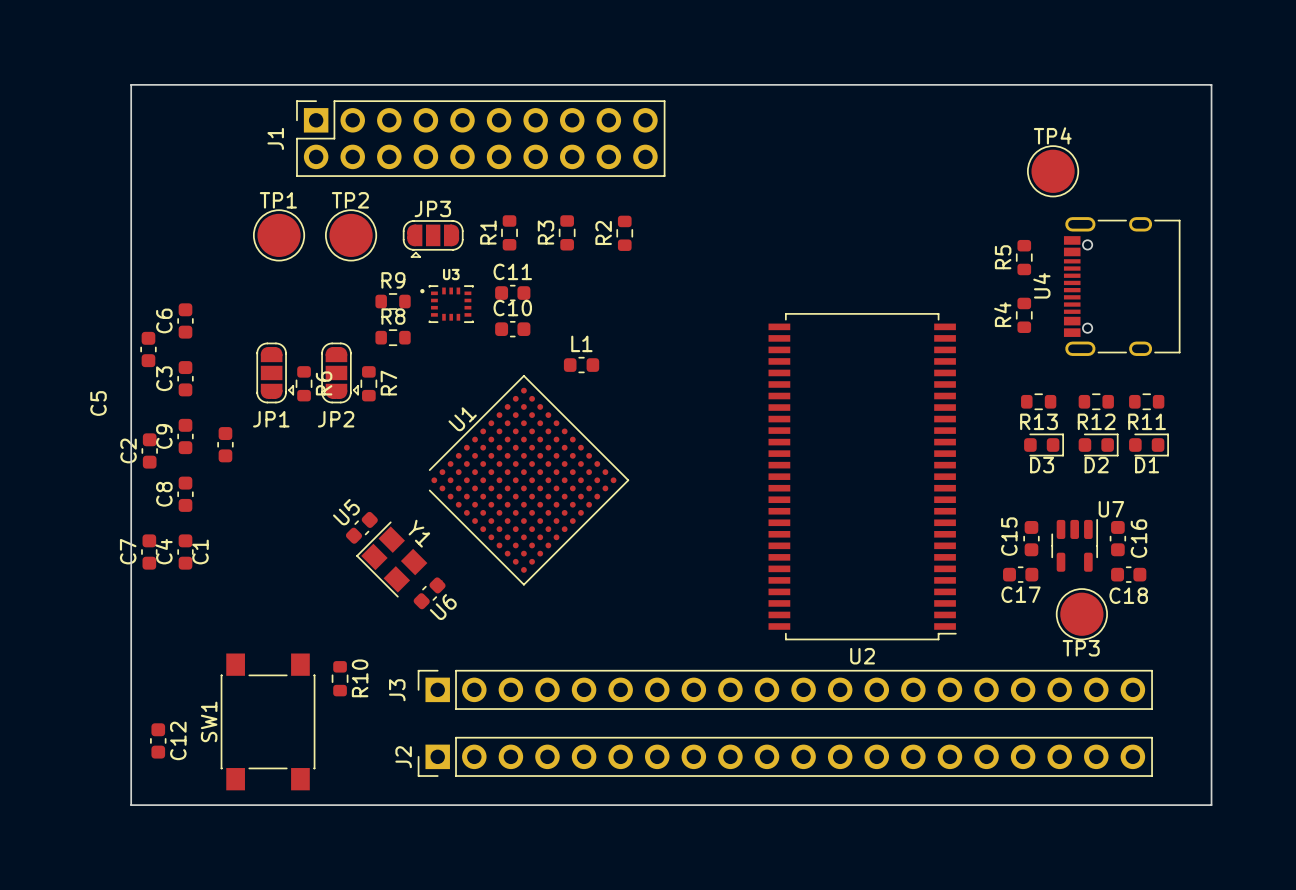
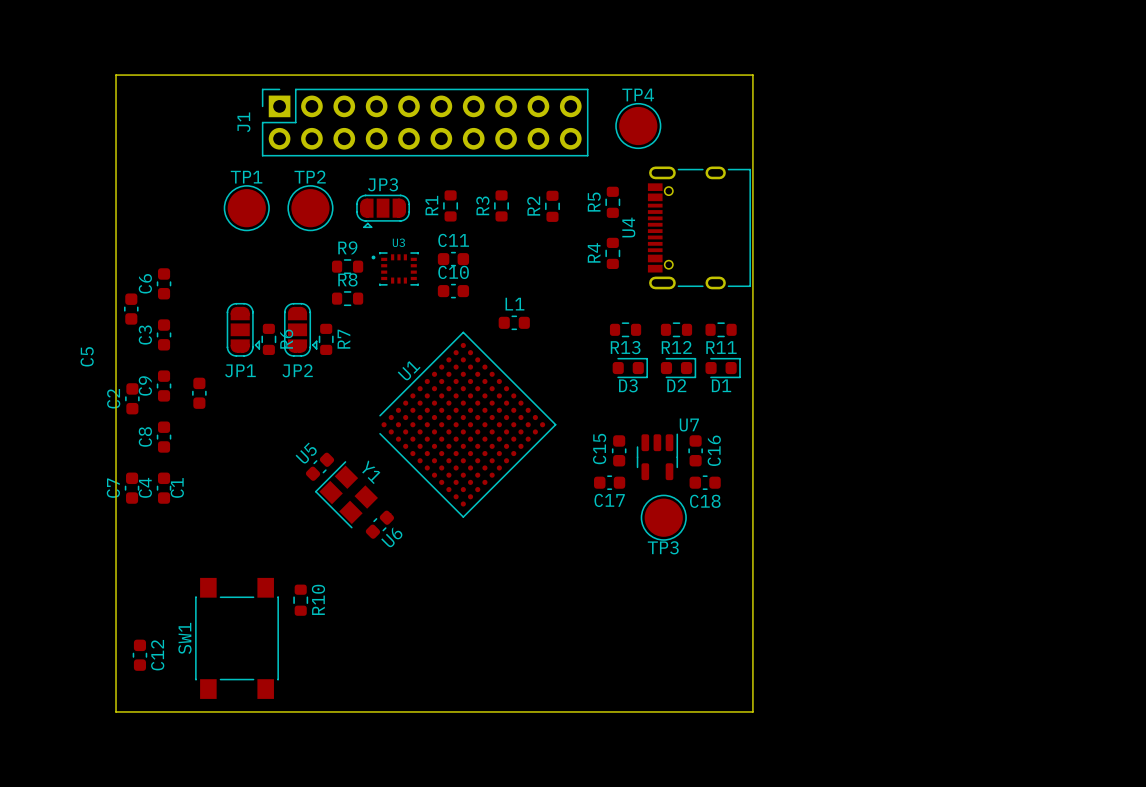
board edge: (851, 84) (1211, 84) (1211, 805) (851, 805) -> (752, 75) (752, 711)
TP4 position: (1053, 171) -> (638, 126)
R5 position: (1024, 257) -> (612, 202)
U4 position: (1122, 286) -> (699, 227)
R4 position: (1024, 315) -> (612, 253)
R13 position: (1038, 401) -> (625, 329)
R12 position: (1096, 401) -> (676, 329)
R11 position: (1146, 401) -> (721, 329)
D3 position: (1044, 444) -> (630, 368)
D2 position: (1098, 444) -> (678, 368)
D1 position: (1149, 444) -> (723, 368)
U2: (862, 476) -> none
C15 position: (1031, 538) -> (619, 450)
C16 position: (1117, 538) -> (695, 450)
U7 position: (1074, 545) -> (657, 456)
C17 position: (1020, 574) -> (609, 482)
C18 position: (1128, 574) -> (705, 482)
TP3 position: (1081, 614) -> (663, 517)
J3: (785, 689) -> none
J2: (785, 756) -> none

